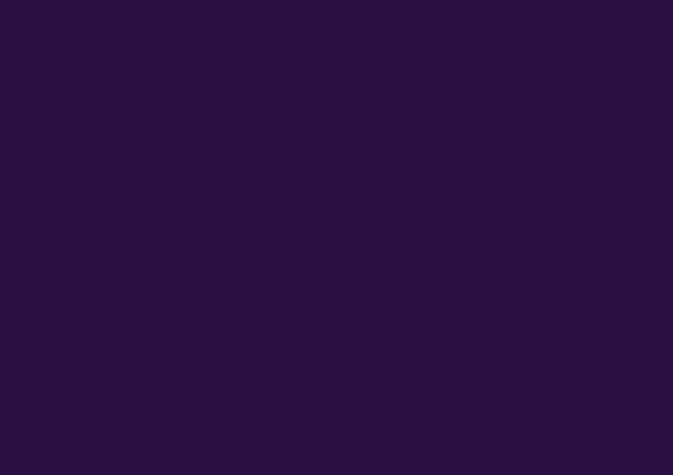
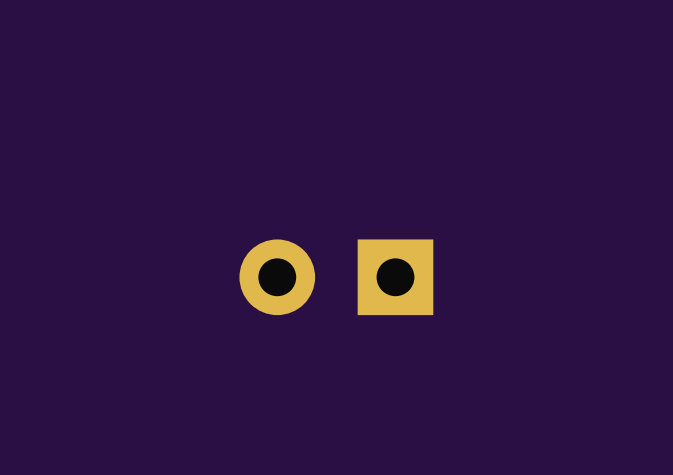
part: none -> (336, 277)

